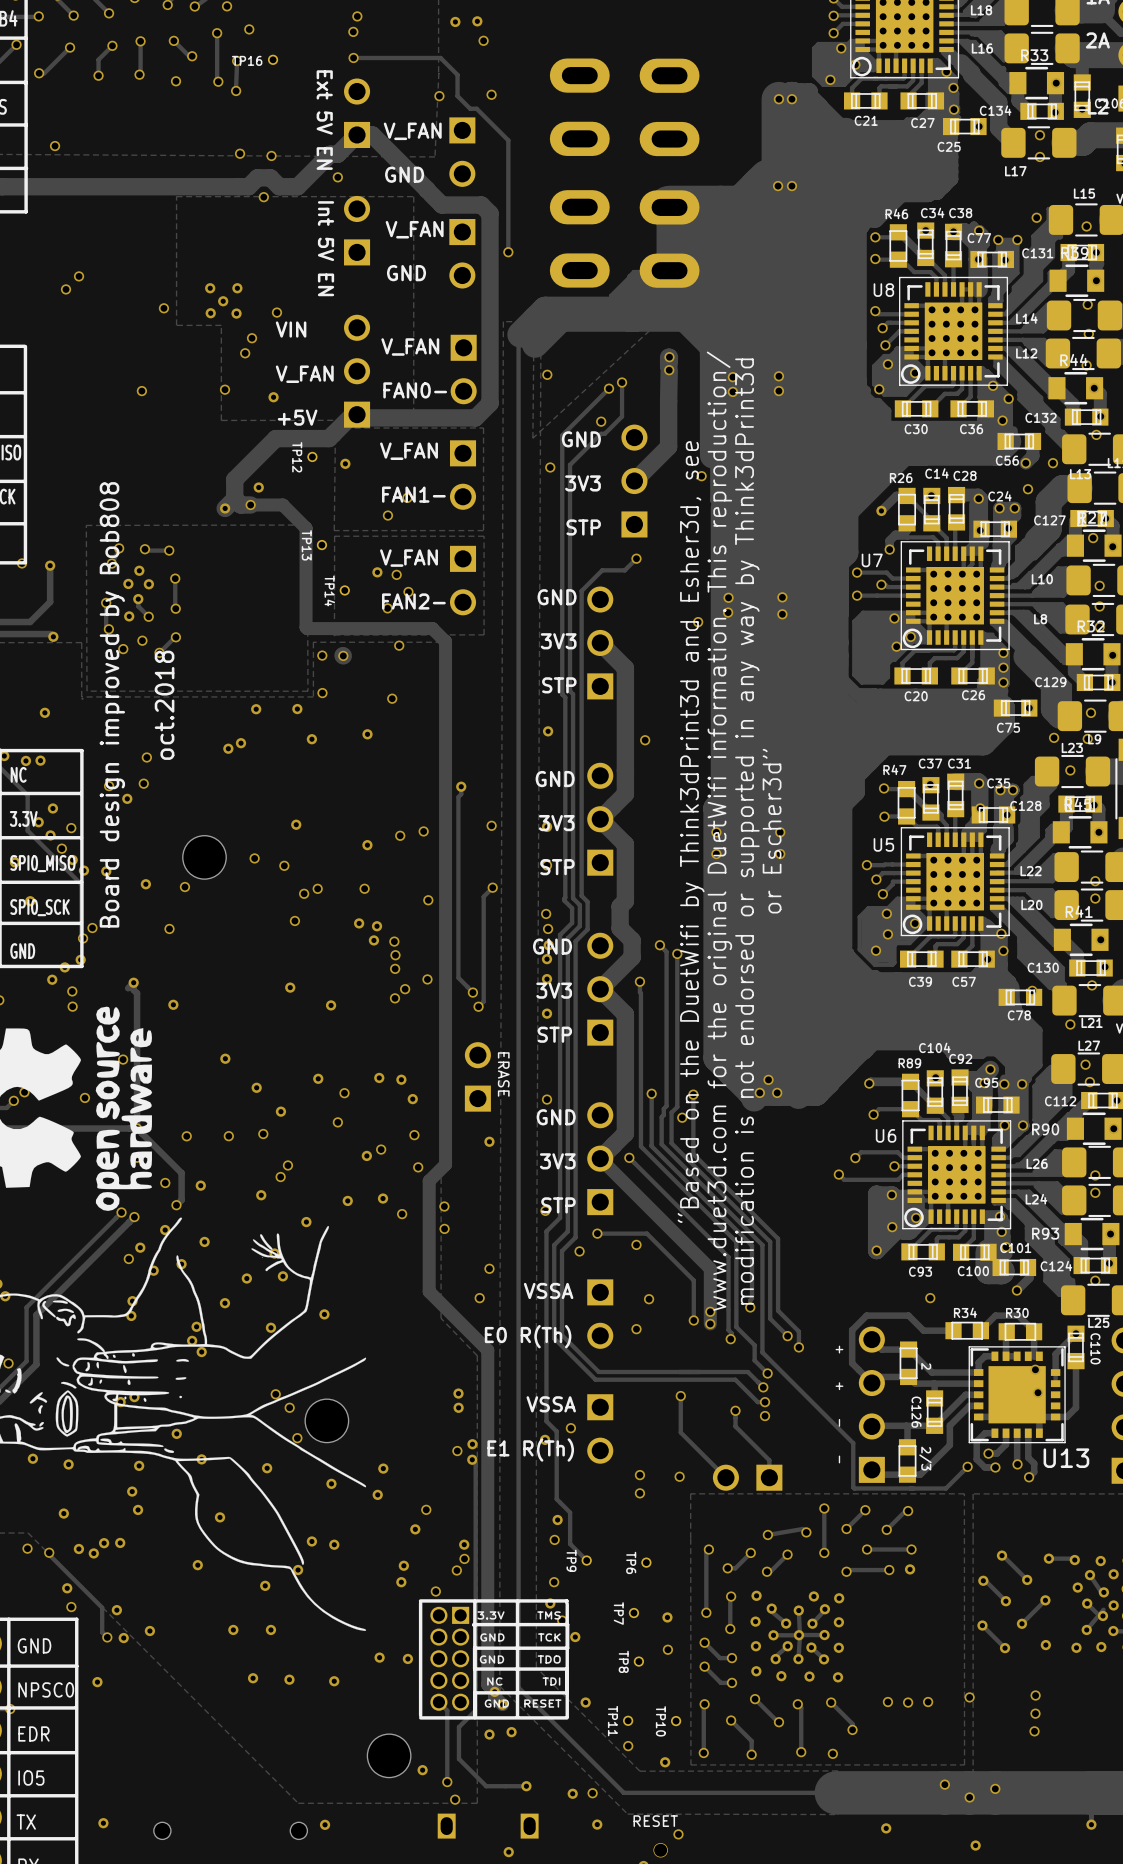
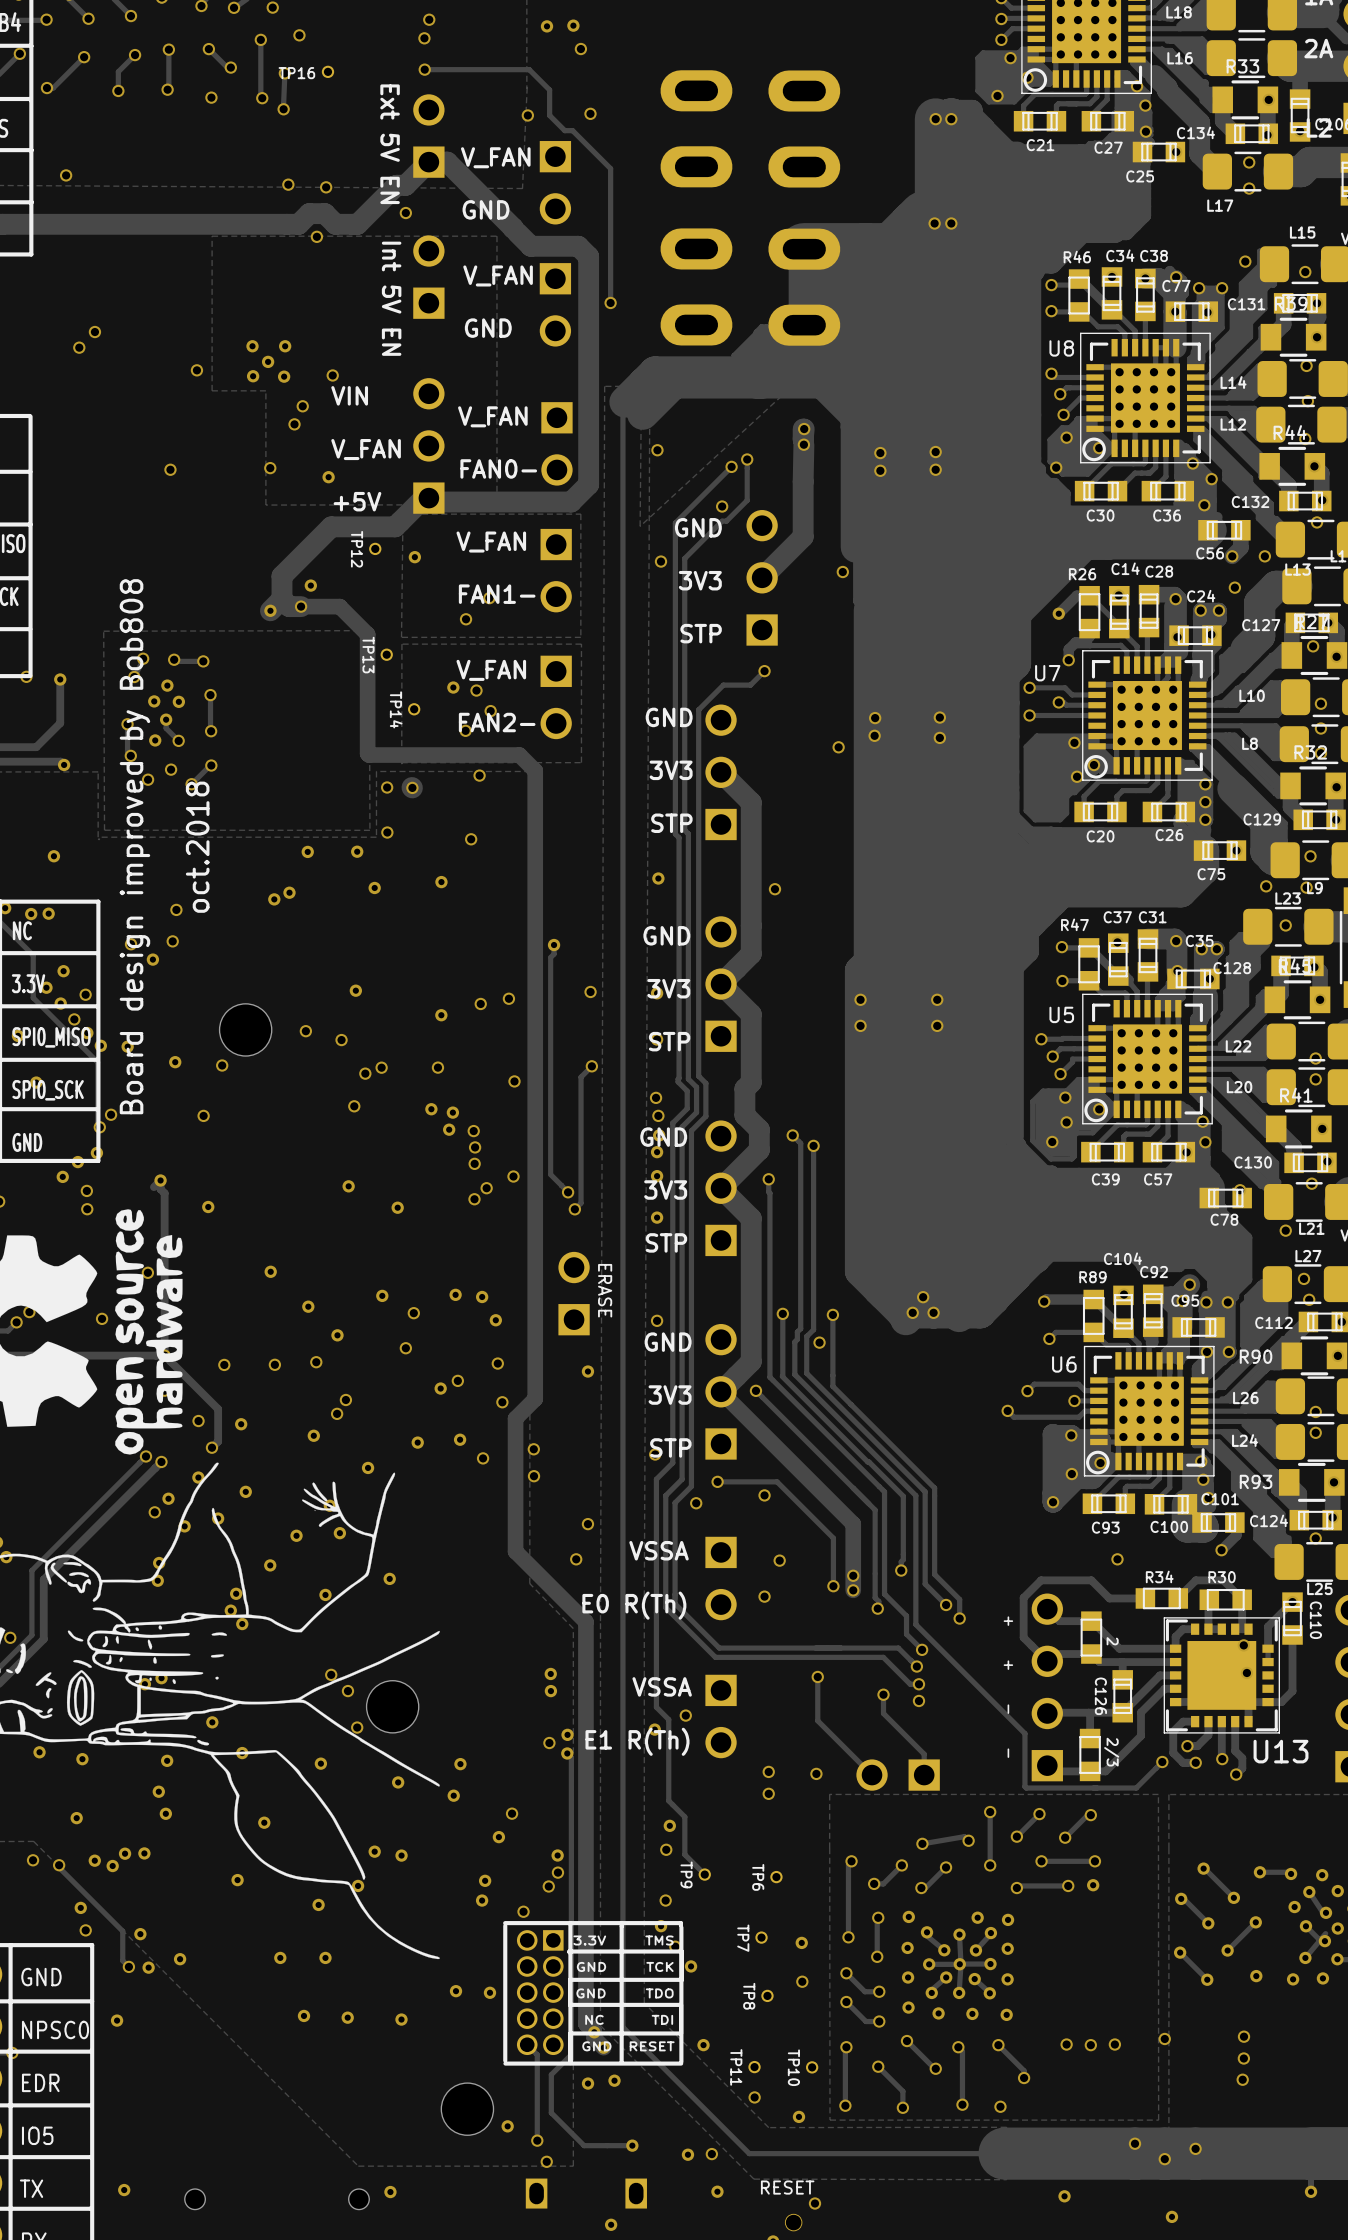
text: www.duet3d.com for the original DuetWifi information. This reproduction/ (719, 831) -> none
text: modification is not endorsed or supported in any way by Think3dPrint3d (747, 831) -> none
text: or Escher3d” (772, 831) -> none
text: “Based on the DuetWifi by Think3dPrint3d and Esher3d, see (691, 832) -> none

